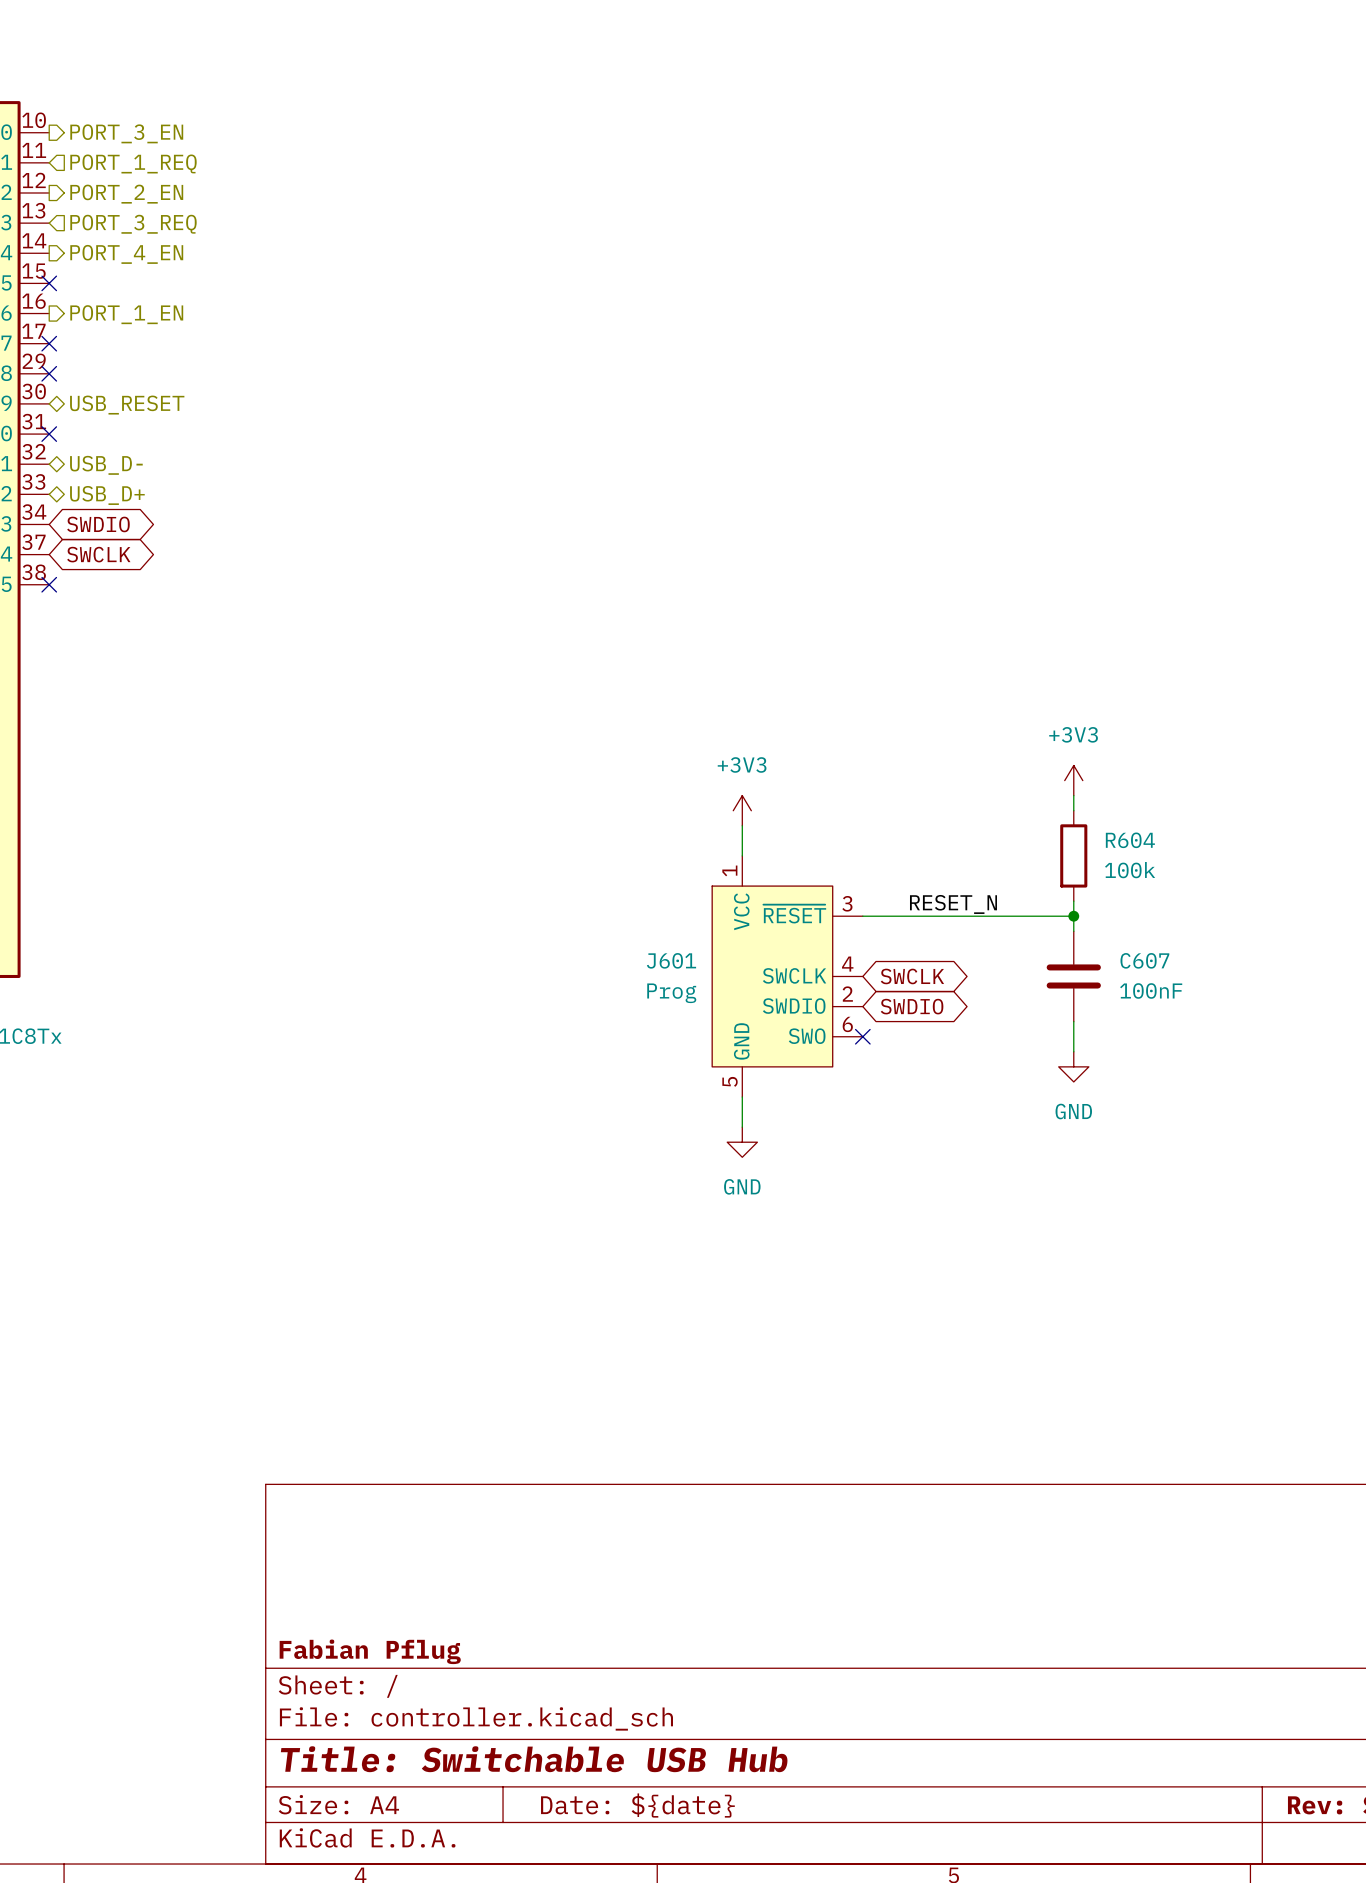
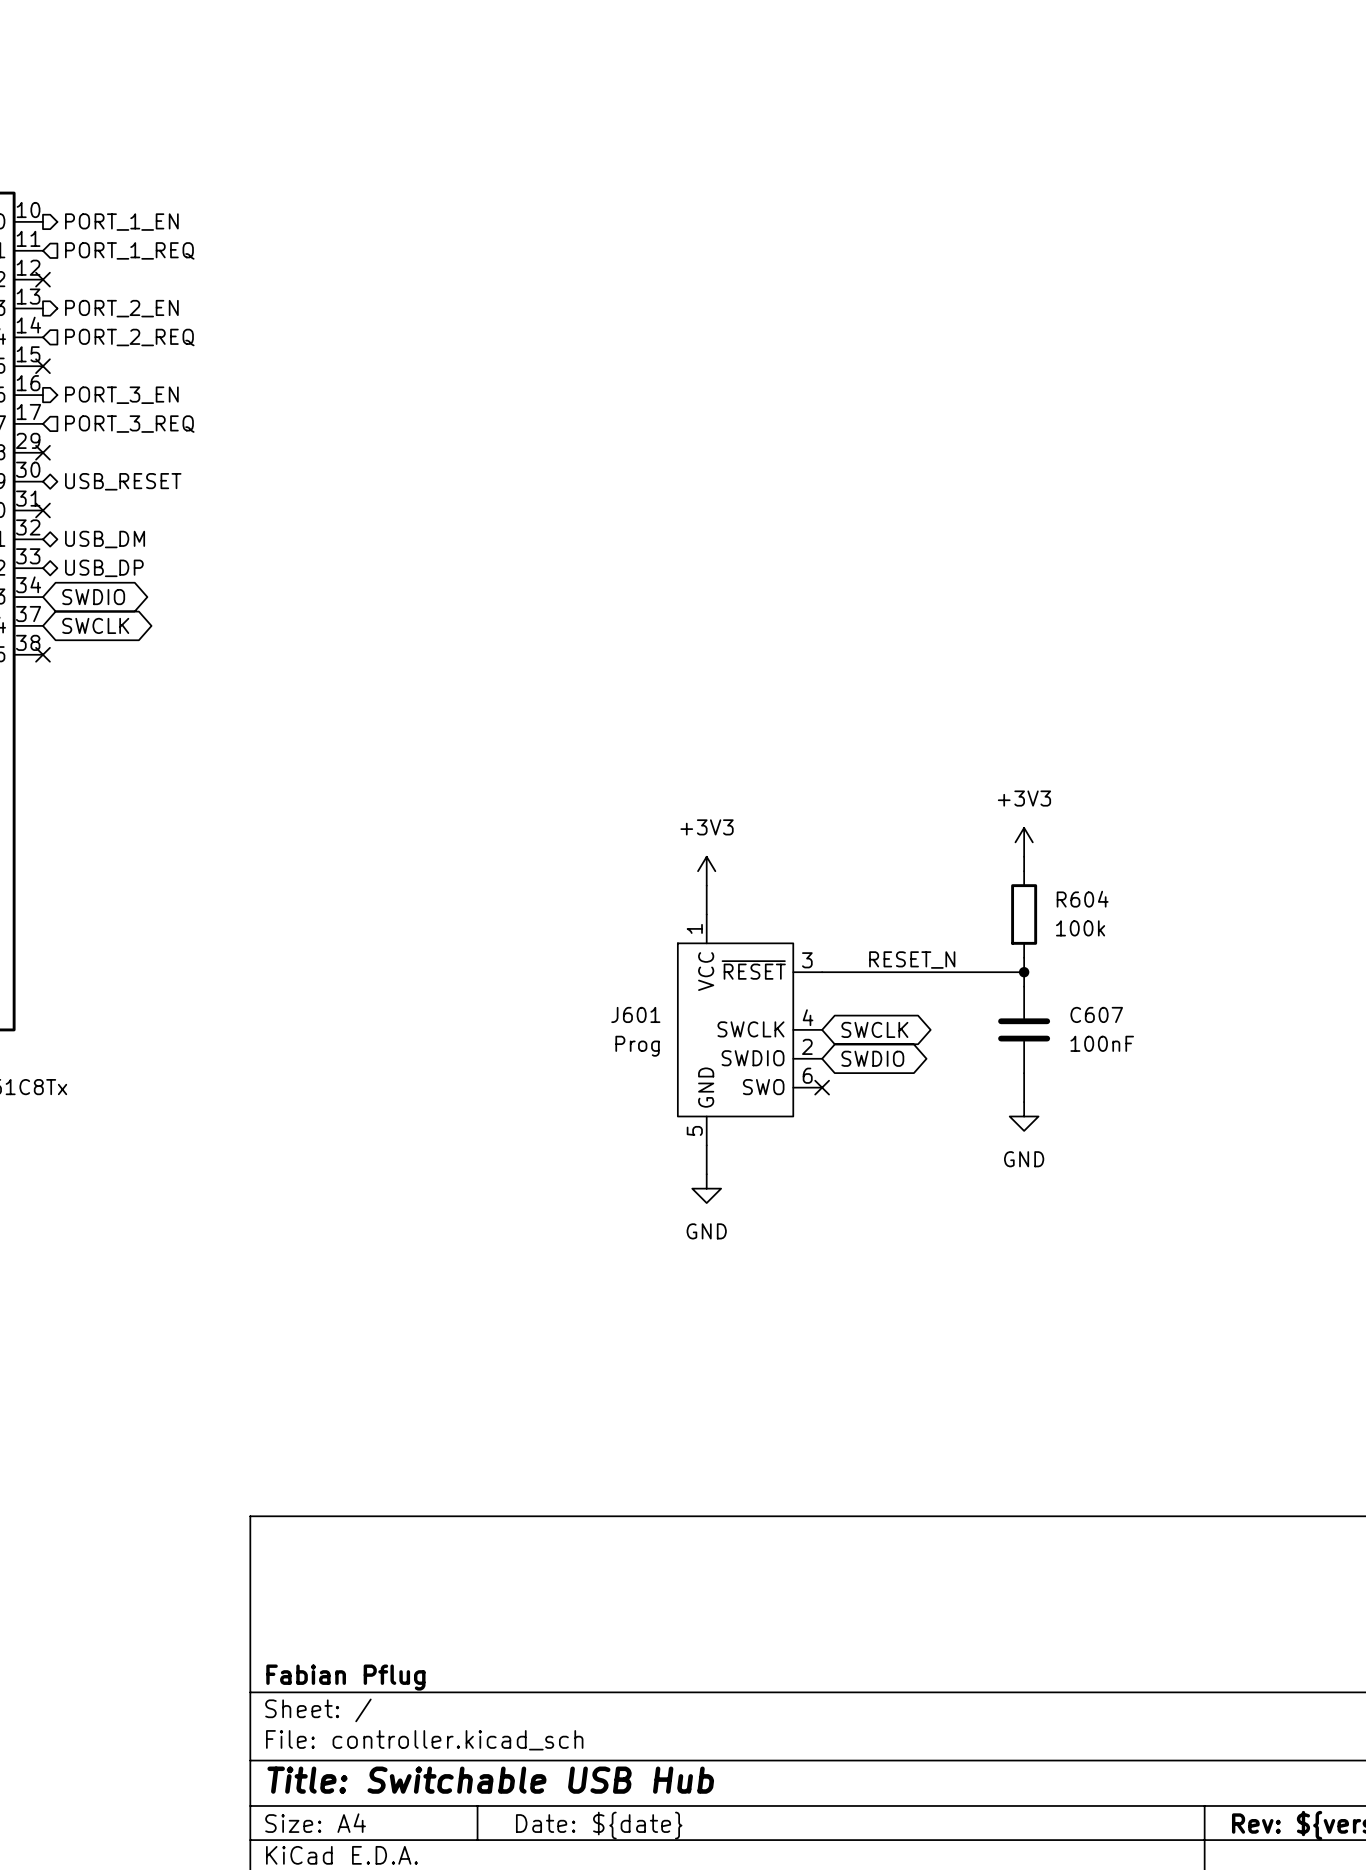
hierarchical label: PORT_3_EN (126, 133) -> PORT_1_EN (121, 222)
no-connect mark: none -> (42, 279)
hierarchical label: PORT_2_EN (126, 194) -> none
hierarchical label shape: input (133, 224) -> output (121, 308)
hierarchical label: PORT_3_REQ (133, 224) -> PORT_2_EN (121, 308)
hierarchical label shape: output (126, 254) -> input (129, 337)
hierarchical label: PORT_4_EN (126, 254) -> PORT_2_REQ (129, 337)
hierarchical label: PORT_1_EN (126, 314) -> PORT_3_EN (121, 395)
no-connect mark: (49, 343) -> none
hierarchical label: none -> PORT_3_REQ (129, 424)
hierarchical label: USB_D- (106, 465) -> USB_DM (105, 539)
hierarchical label: USB_D+ (107, 495) -> USB_DP (104, 568)

